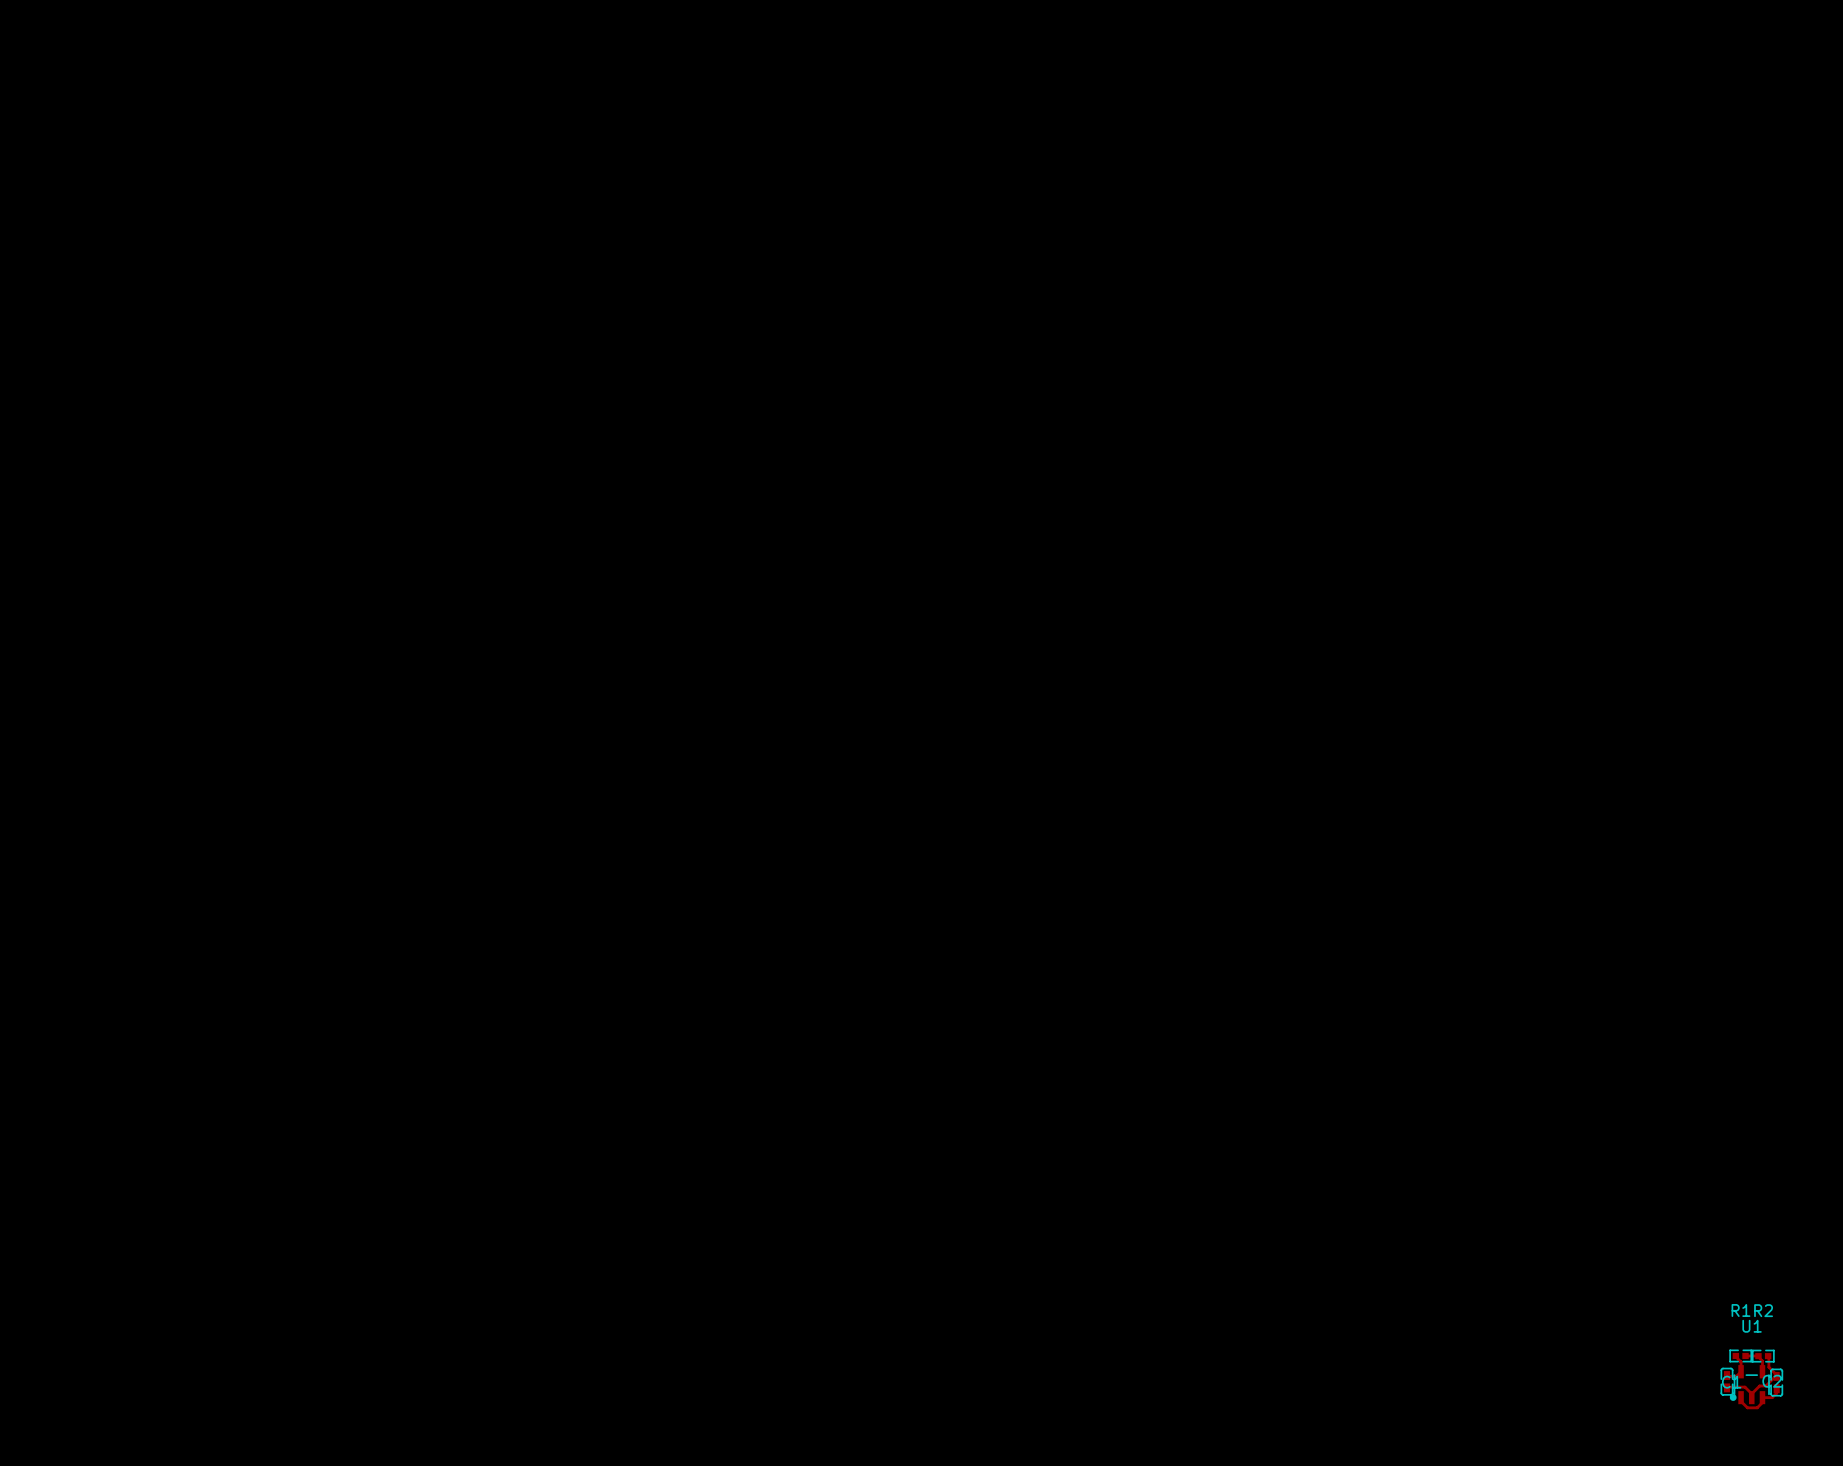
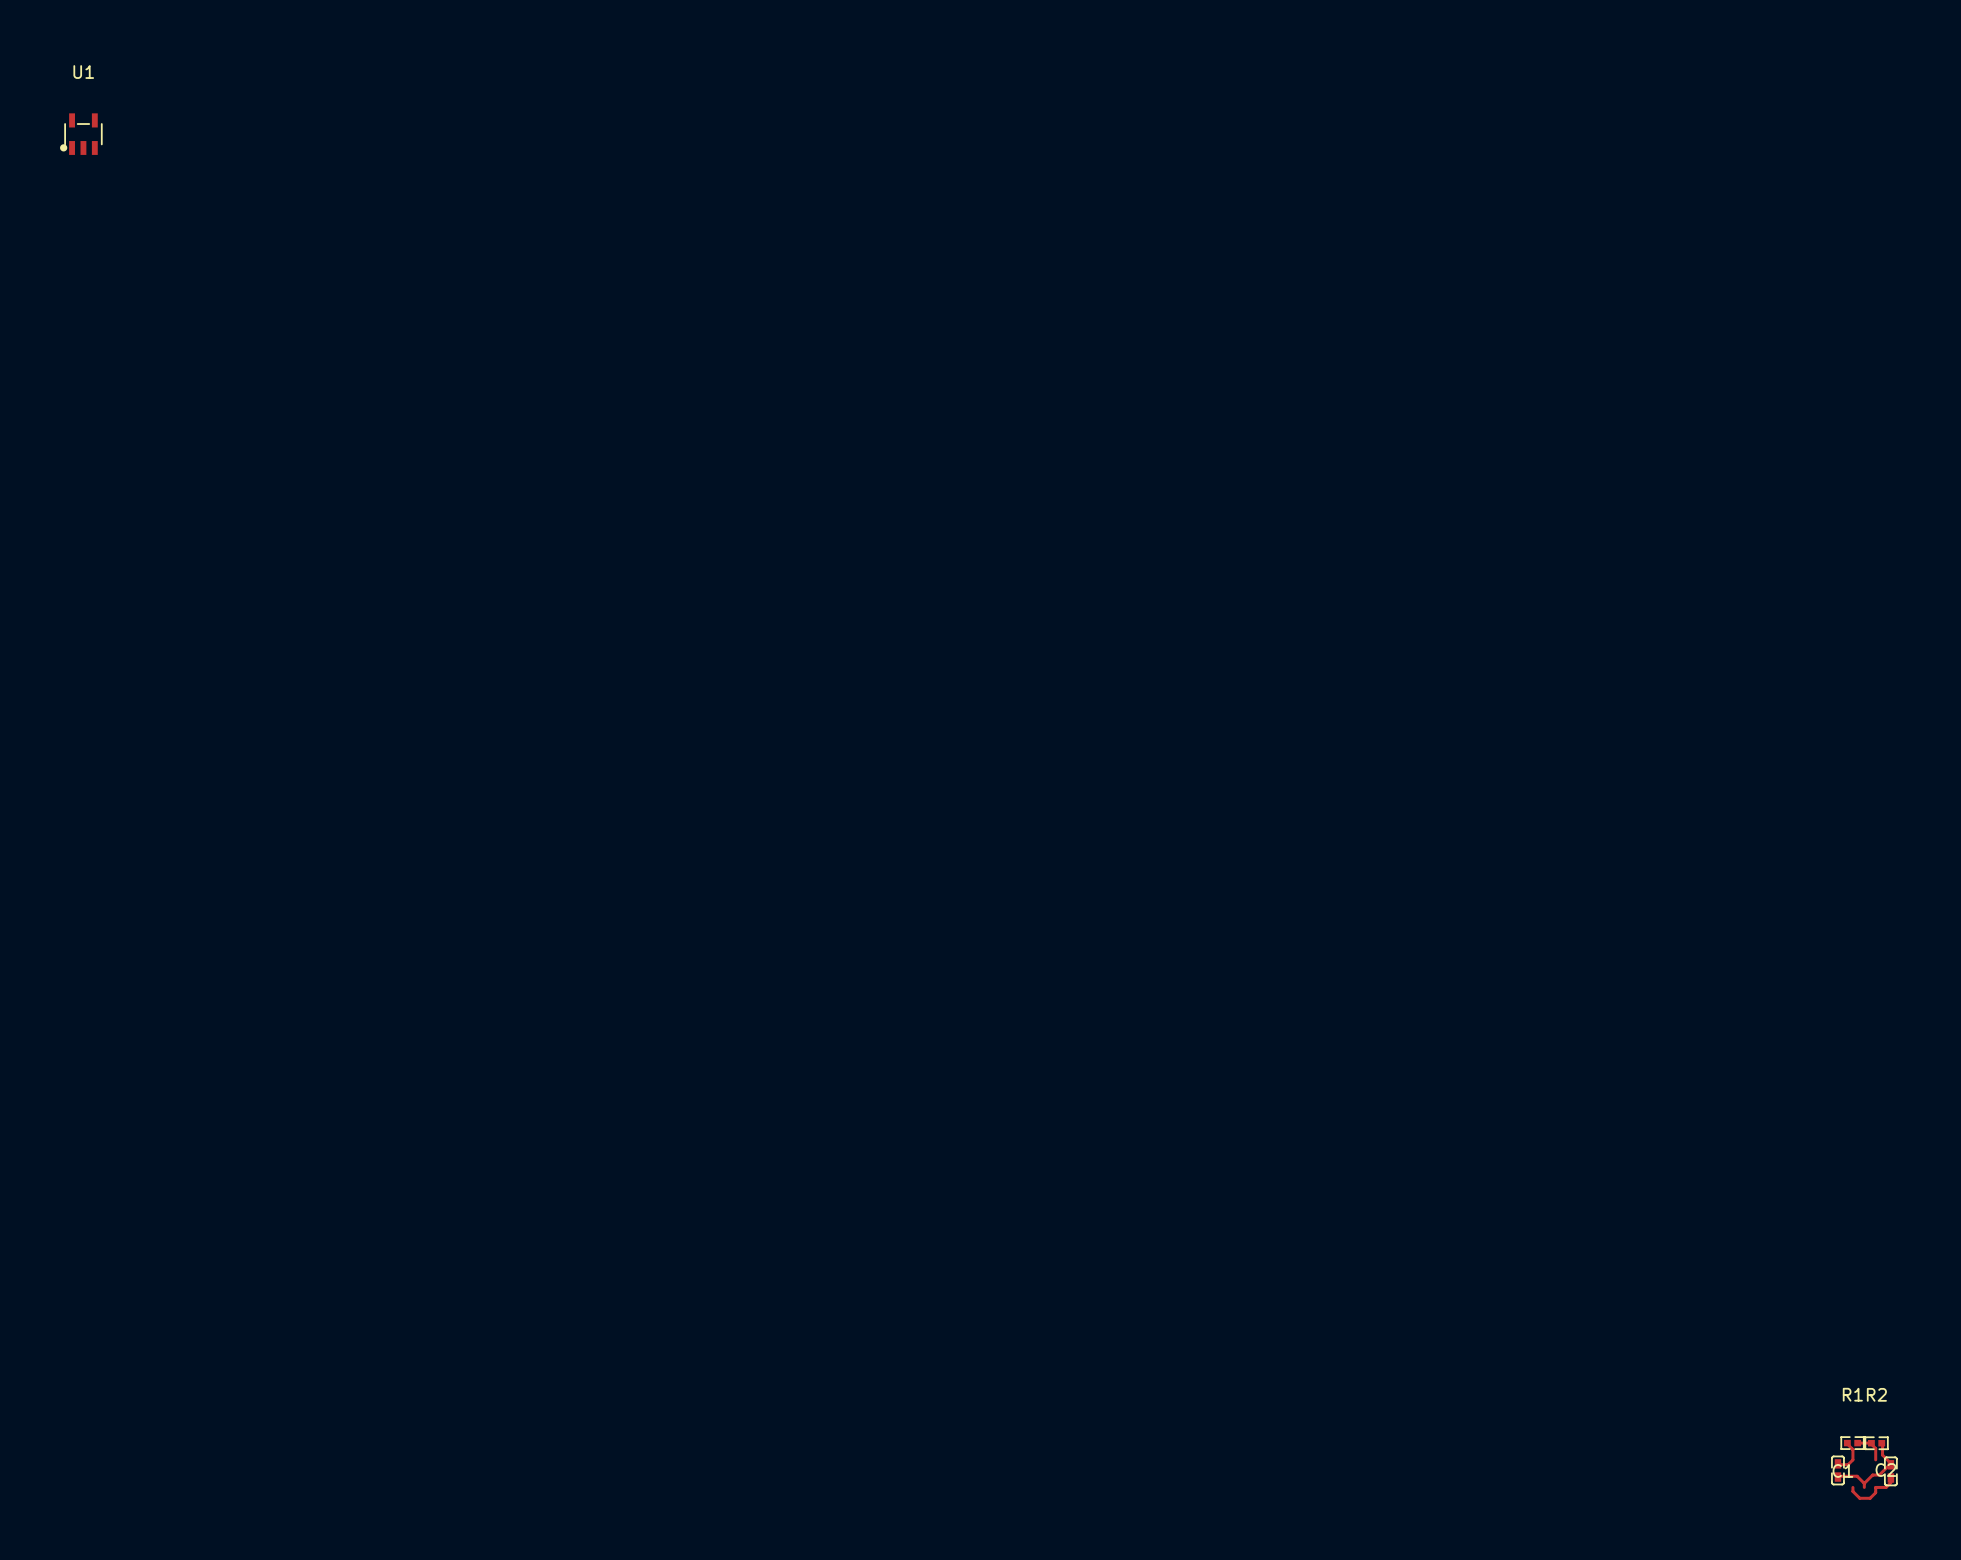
U1 position: (1749, 1384) -> (81, 134)

